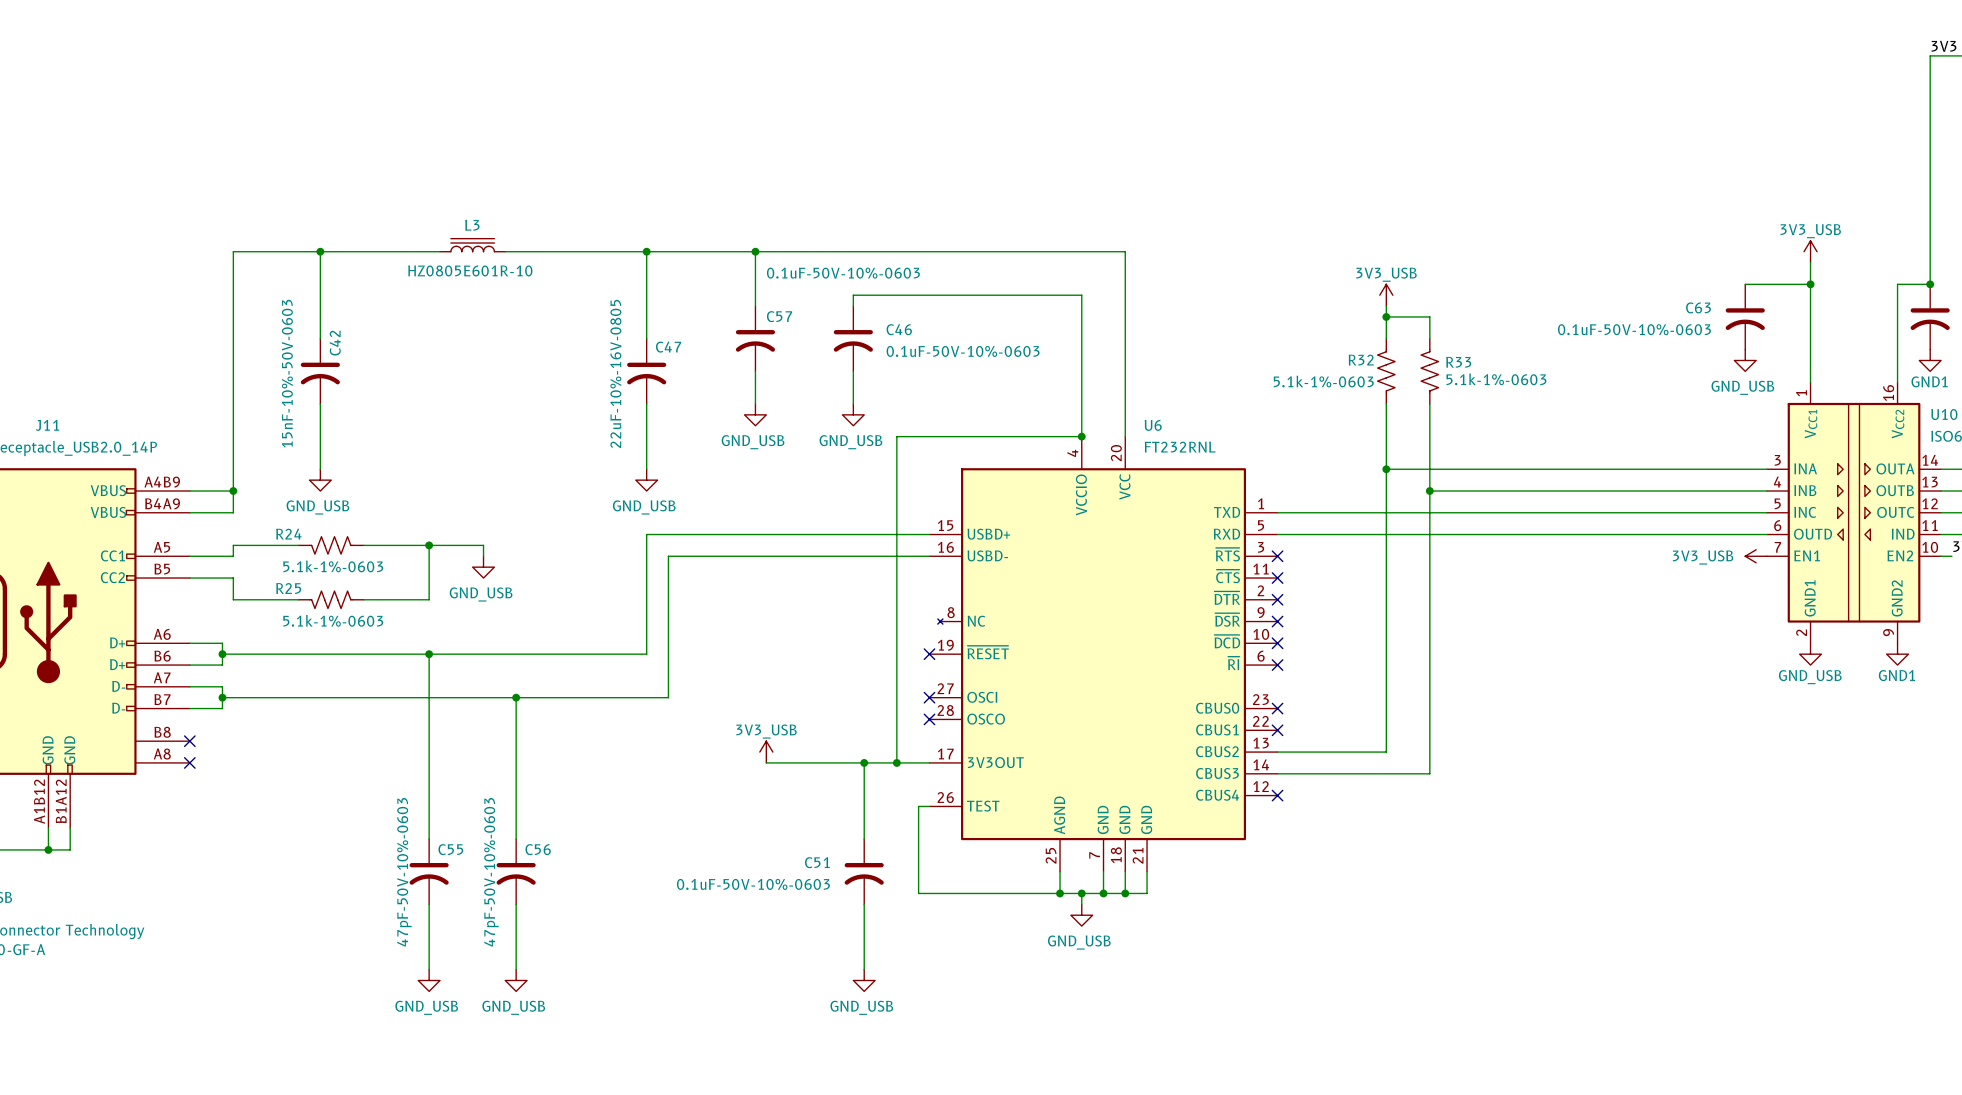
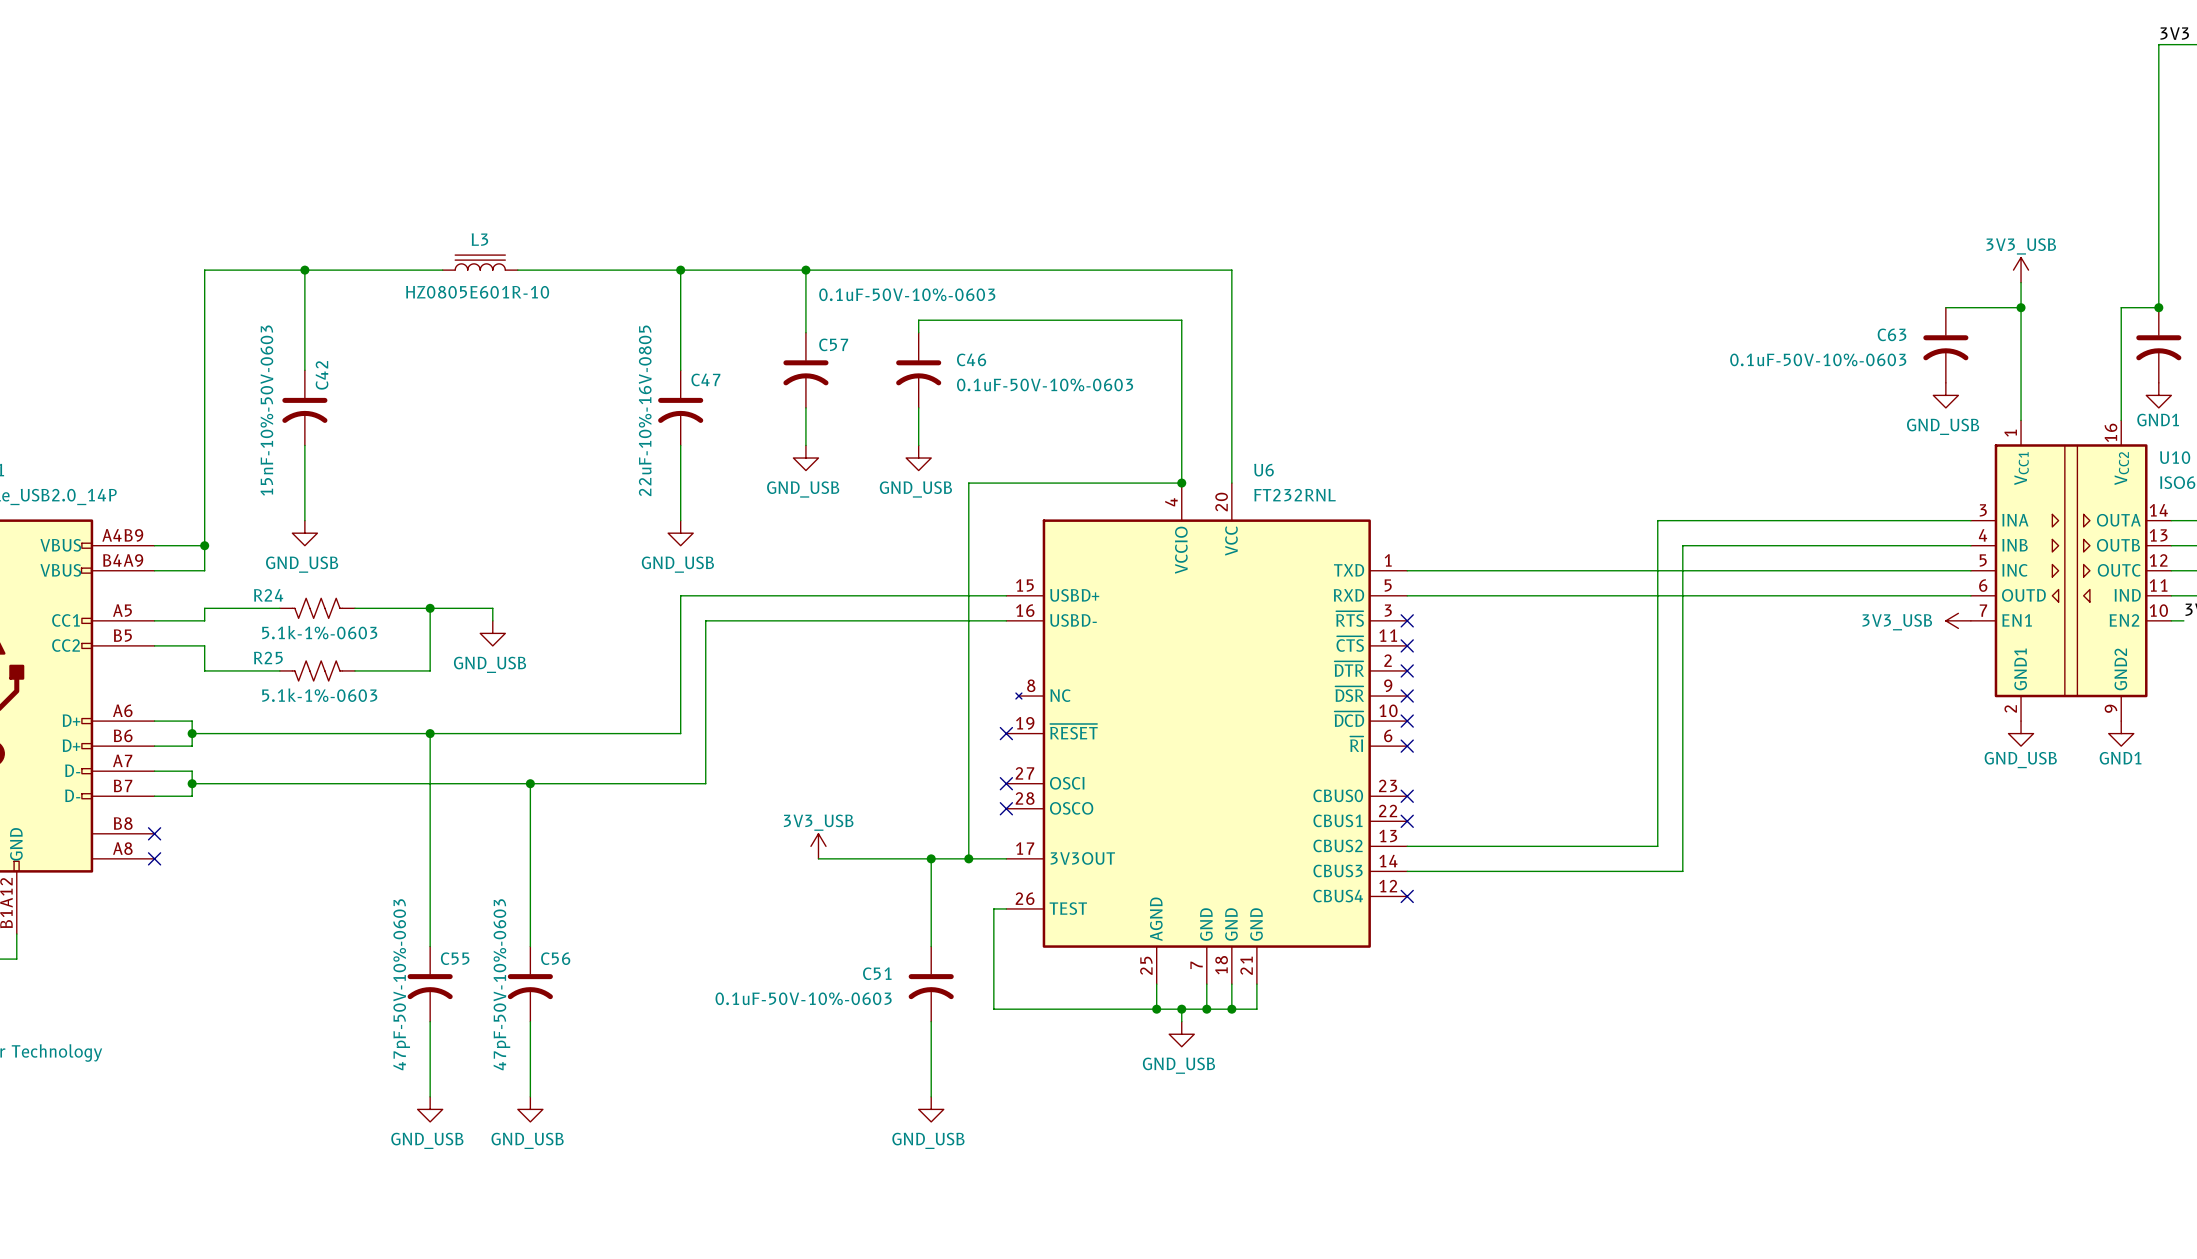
power symbol: 3V3_USB (1386, 295) -> none
wire: (1386, 306) (1386, 338) -> none
wire: (1386, 316) (1429, 316) (1429, 338) -> none
junction: (1386, 316) -> none
R32: 5.1k-1%-0603 (1386, 371) -> none
R33: 5.1k-1%-0603 (1429, 371) -> none
wire: (1386, 403) (1386, 752) -> (1657, 520) (1657, 846) (1532, 846)
wire: (1429, 403) (1429, 773) -> (1682, 545) (1682, 871) (1582, 871)
wire: (1386, 469) (1495, 469) -> none
junction: (1386, 469) -> none
wire: (1429, 491) (1516, 491) -> none
junction: (1429, 491) -> none

